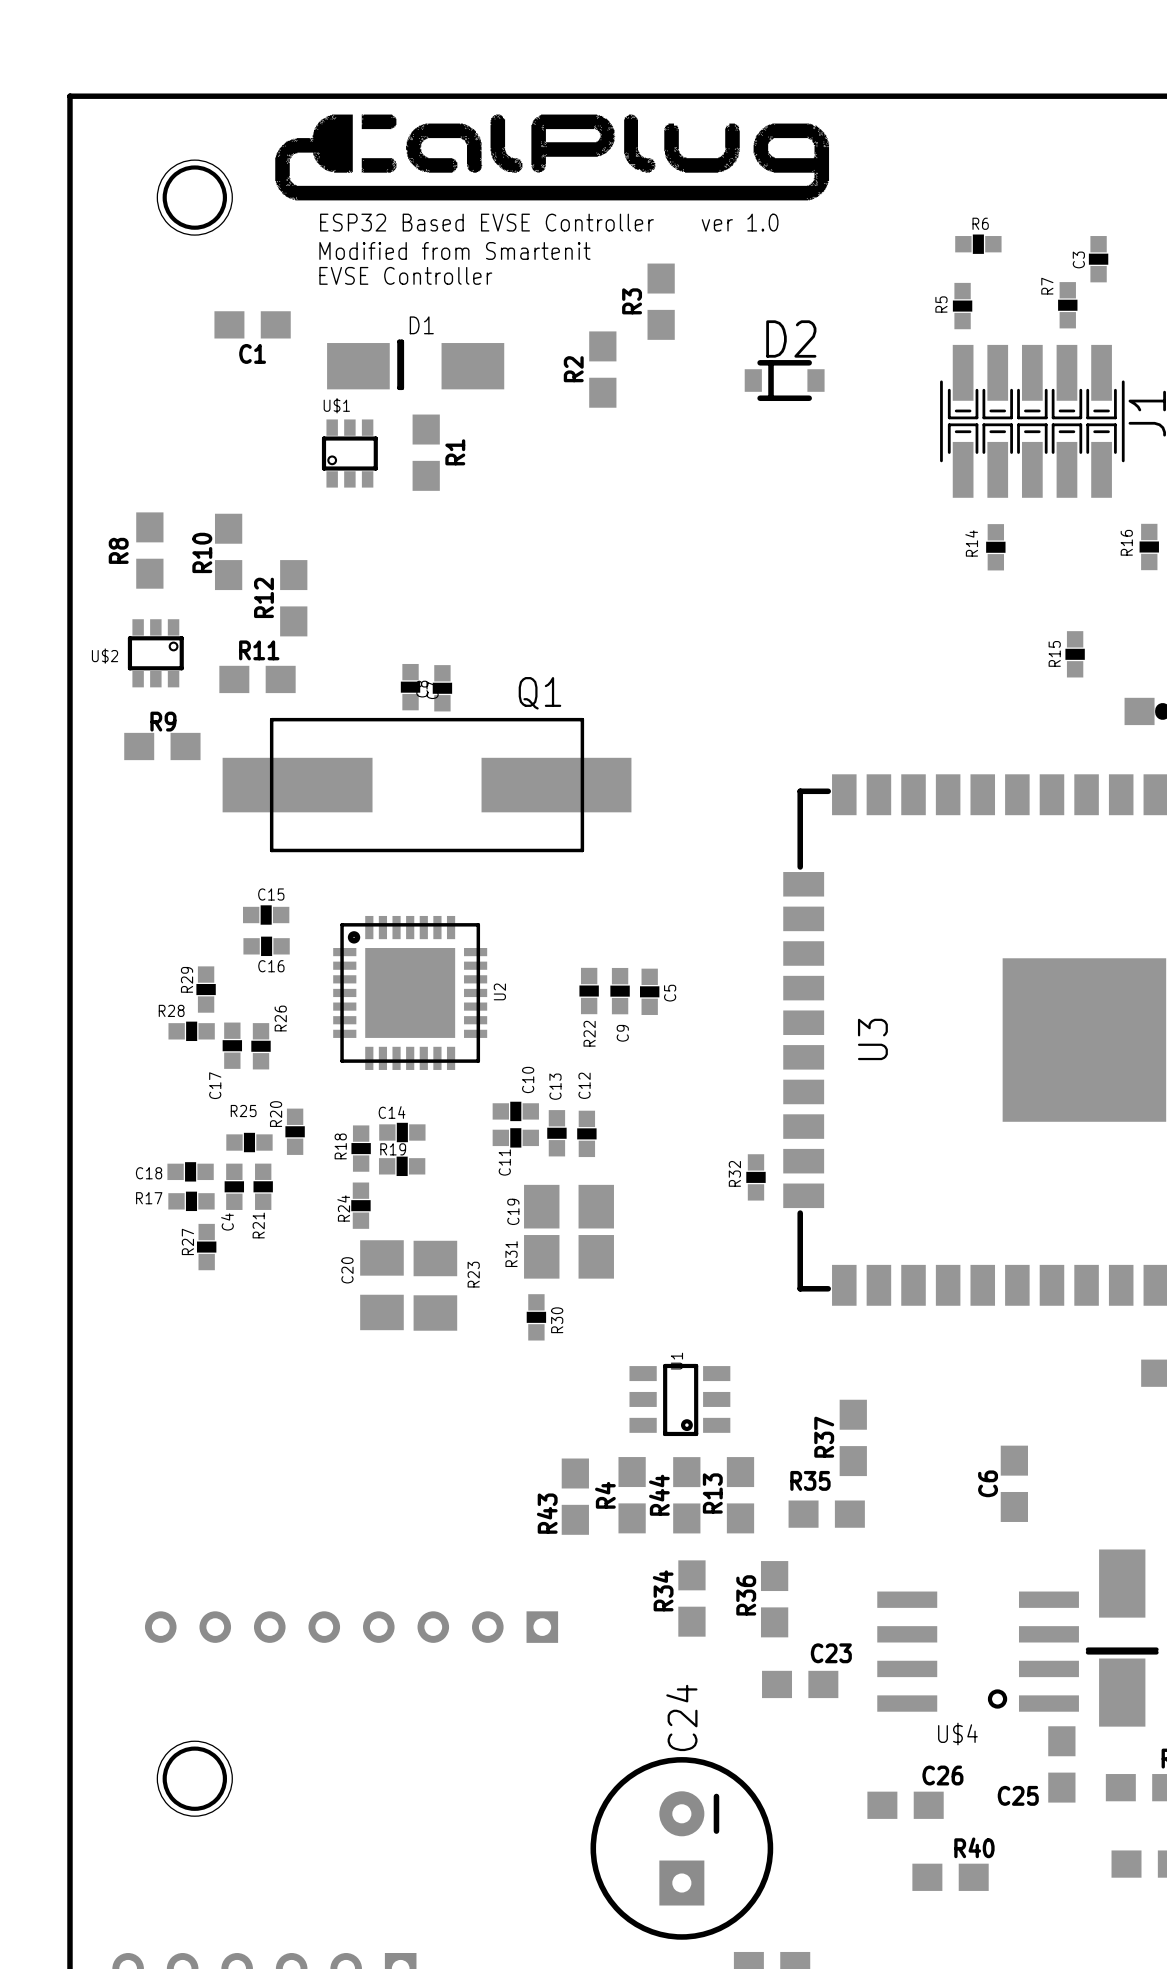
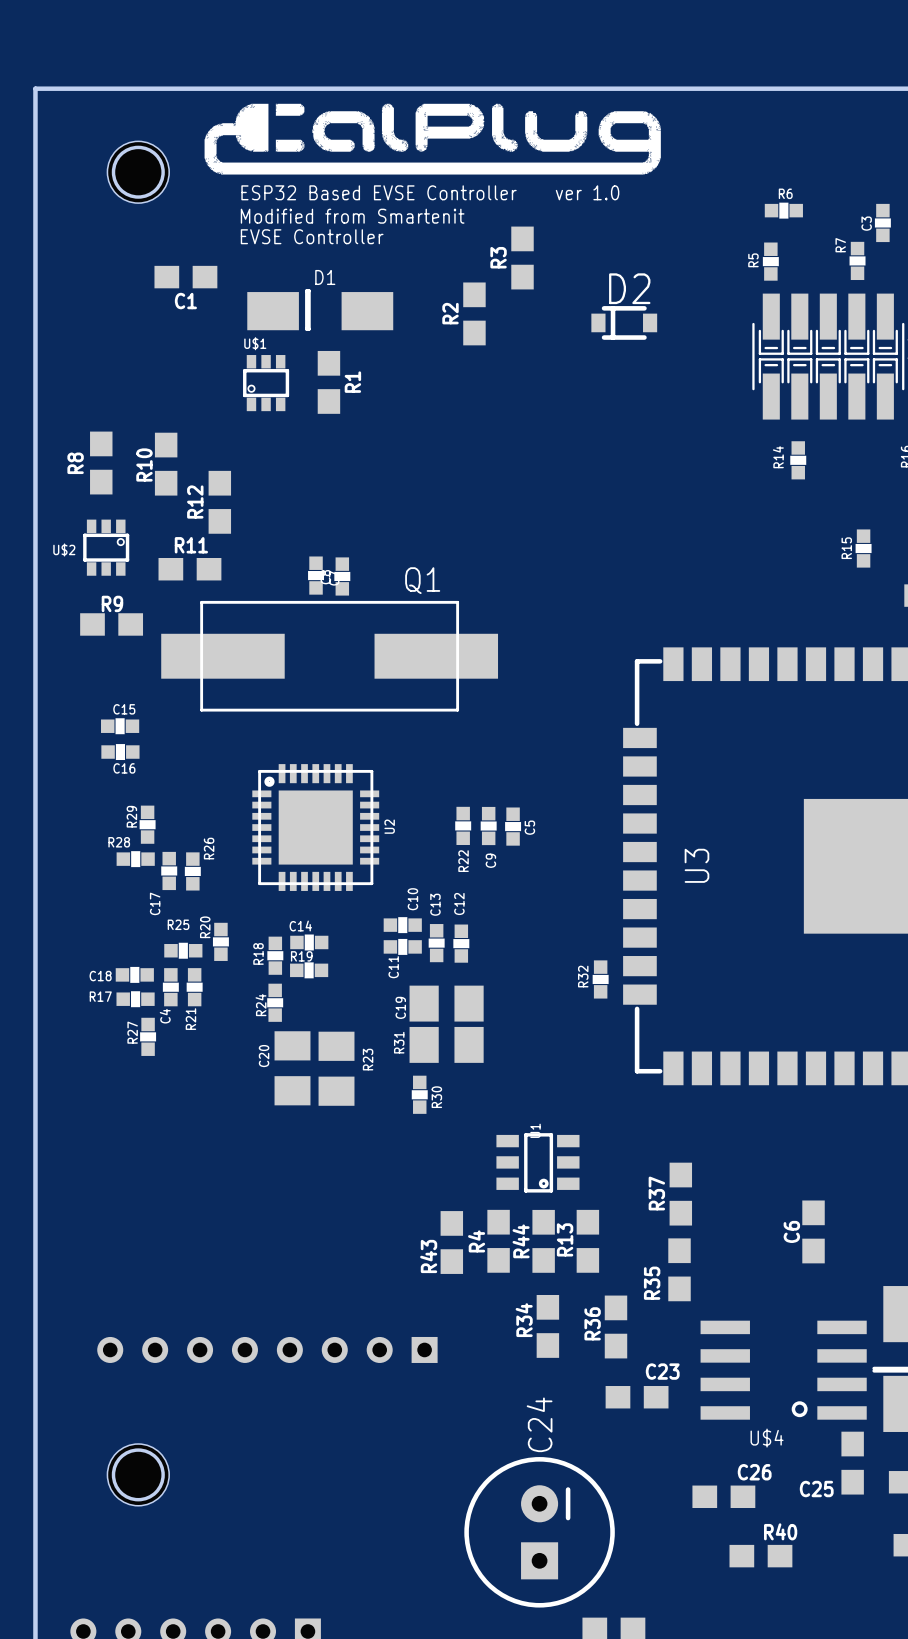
C15 position: (266, 915) -> (120, 726)
C16 position: (266, 946) -> (120, 752)
R35 rotation: 0° (826, 1514) -> 90° clockwise (679, 1269)

